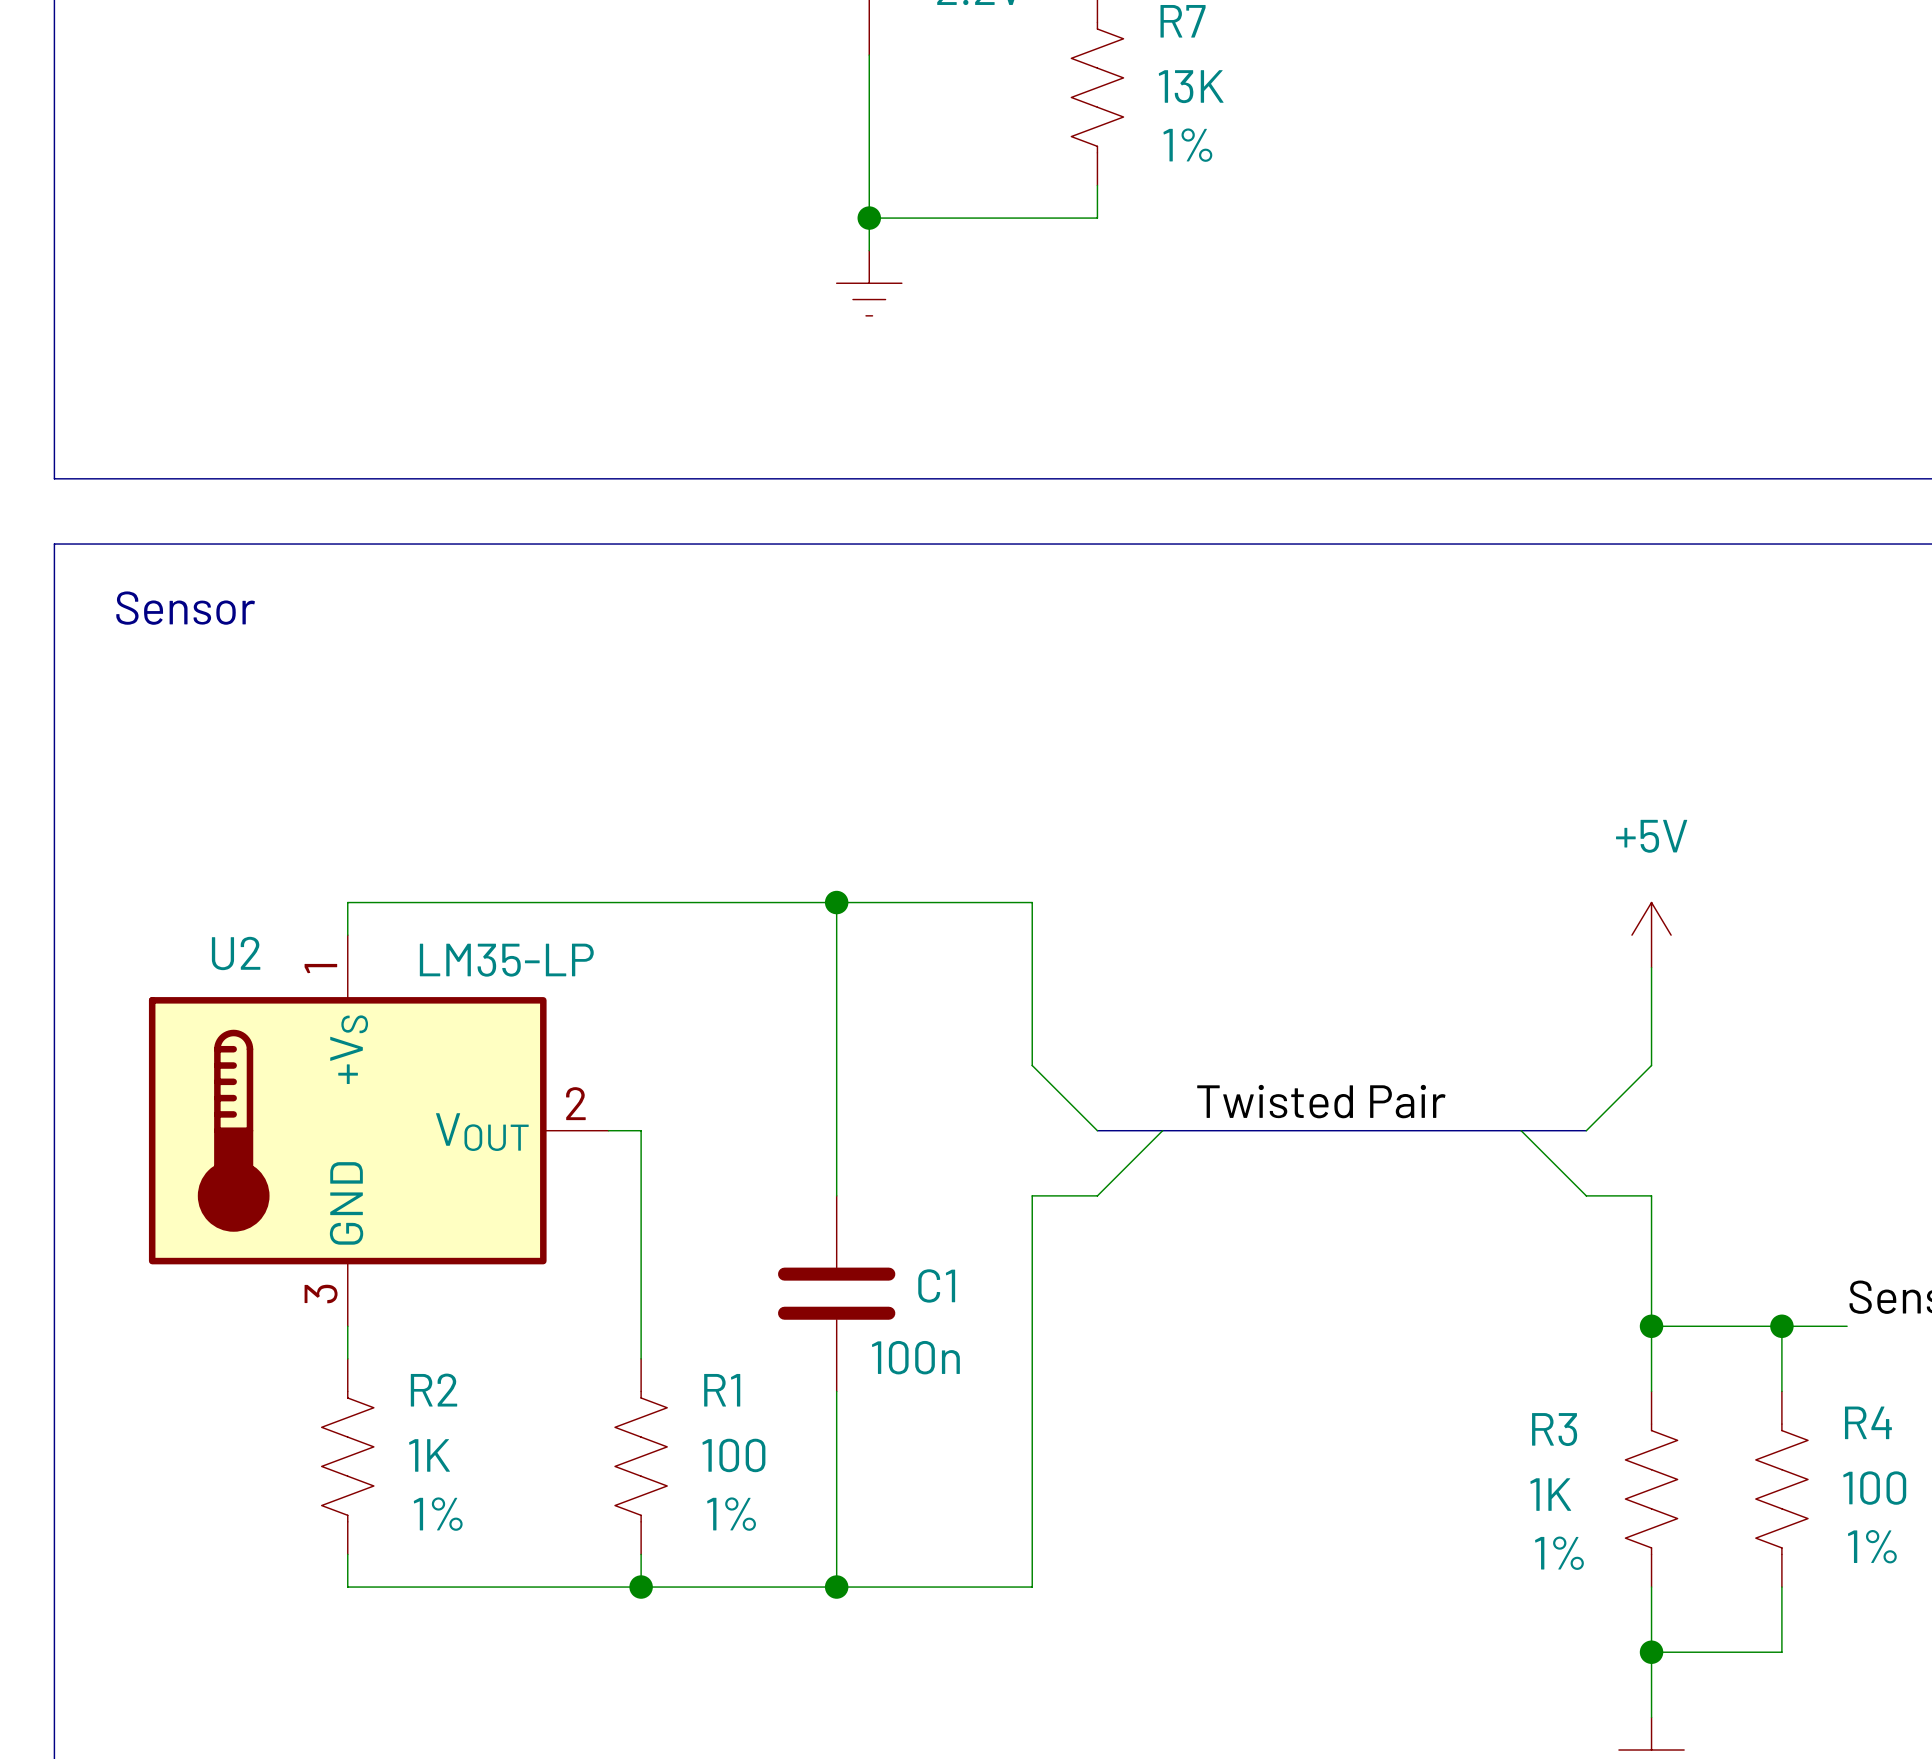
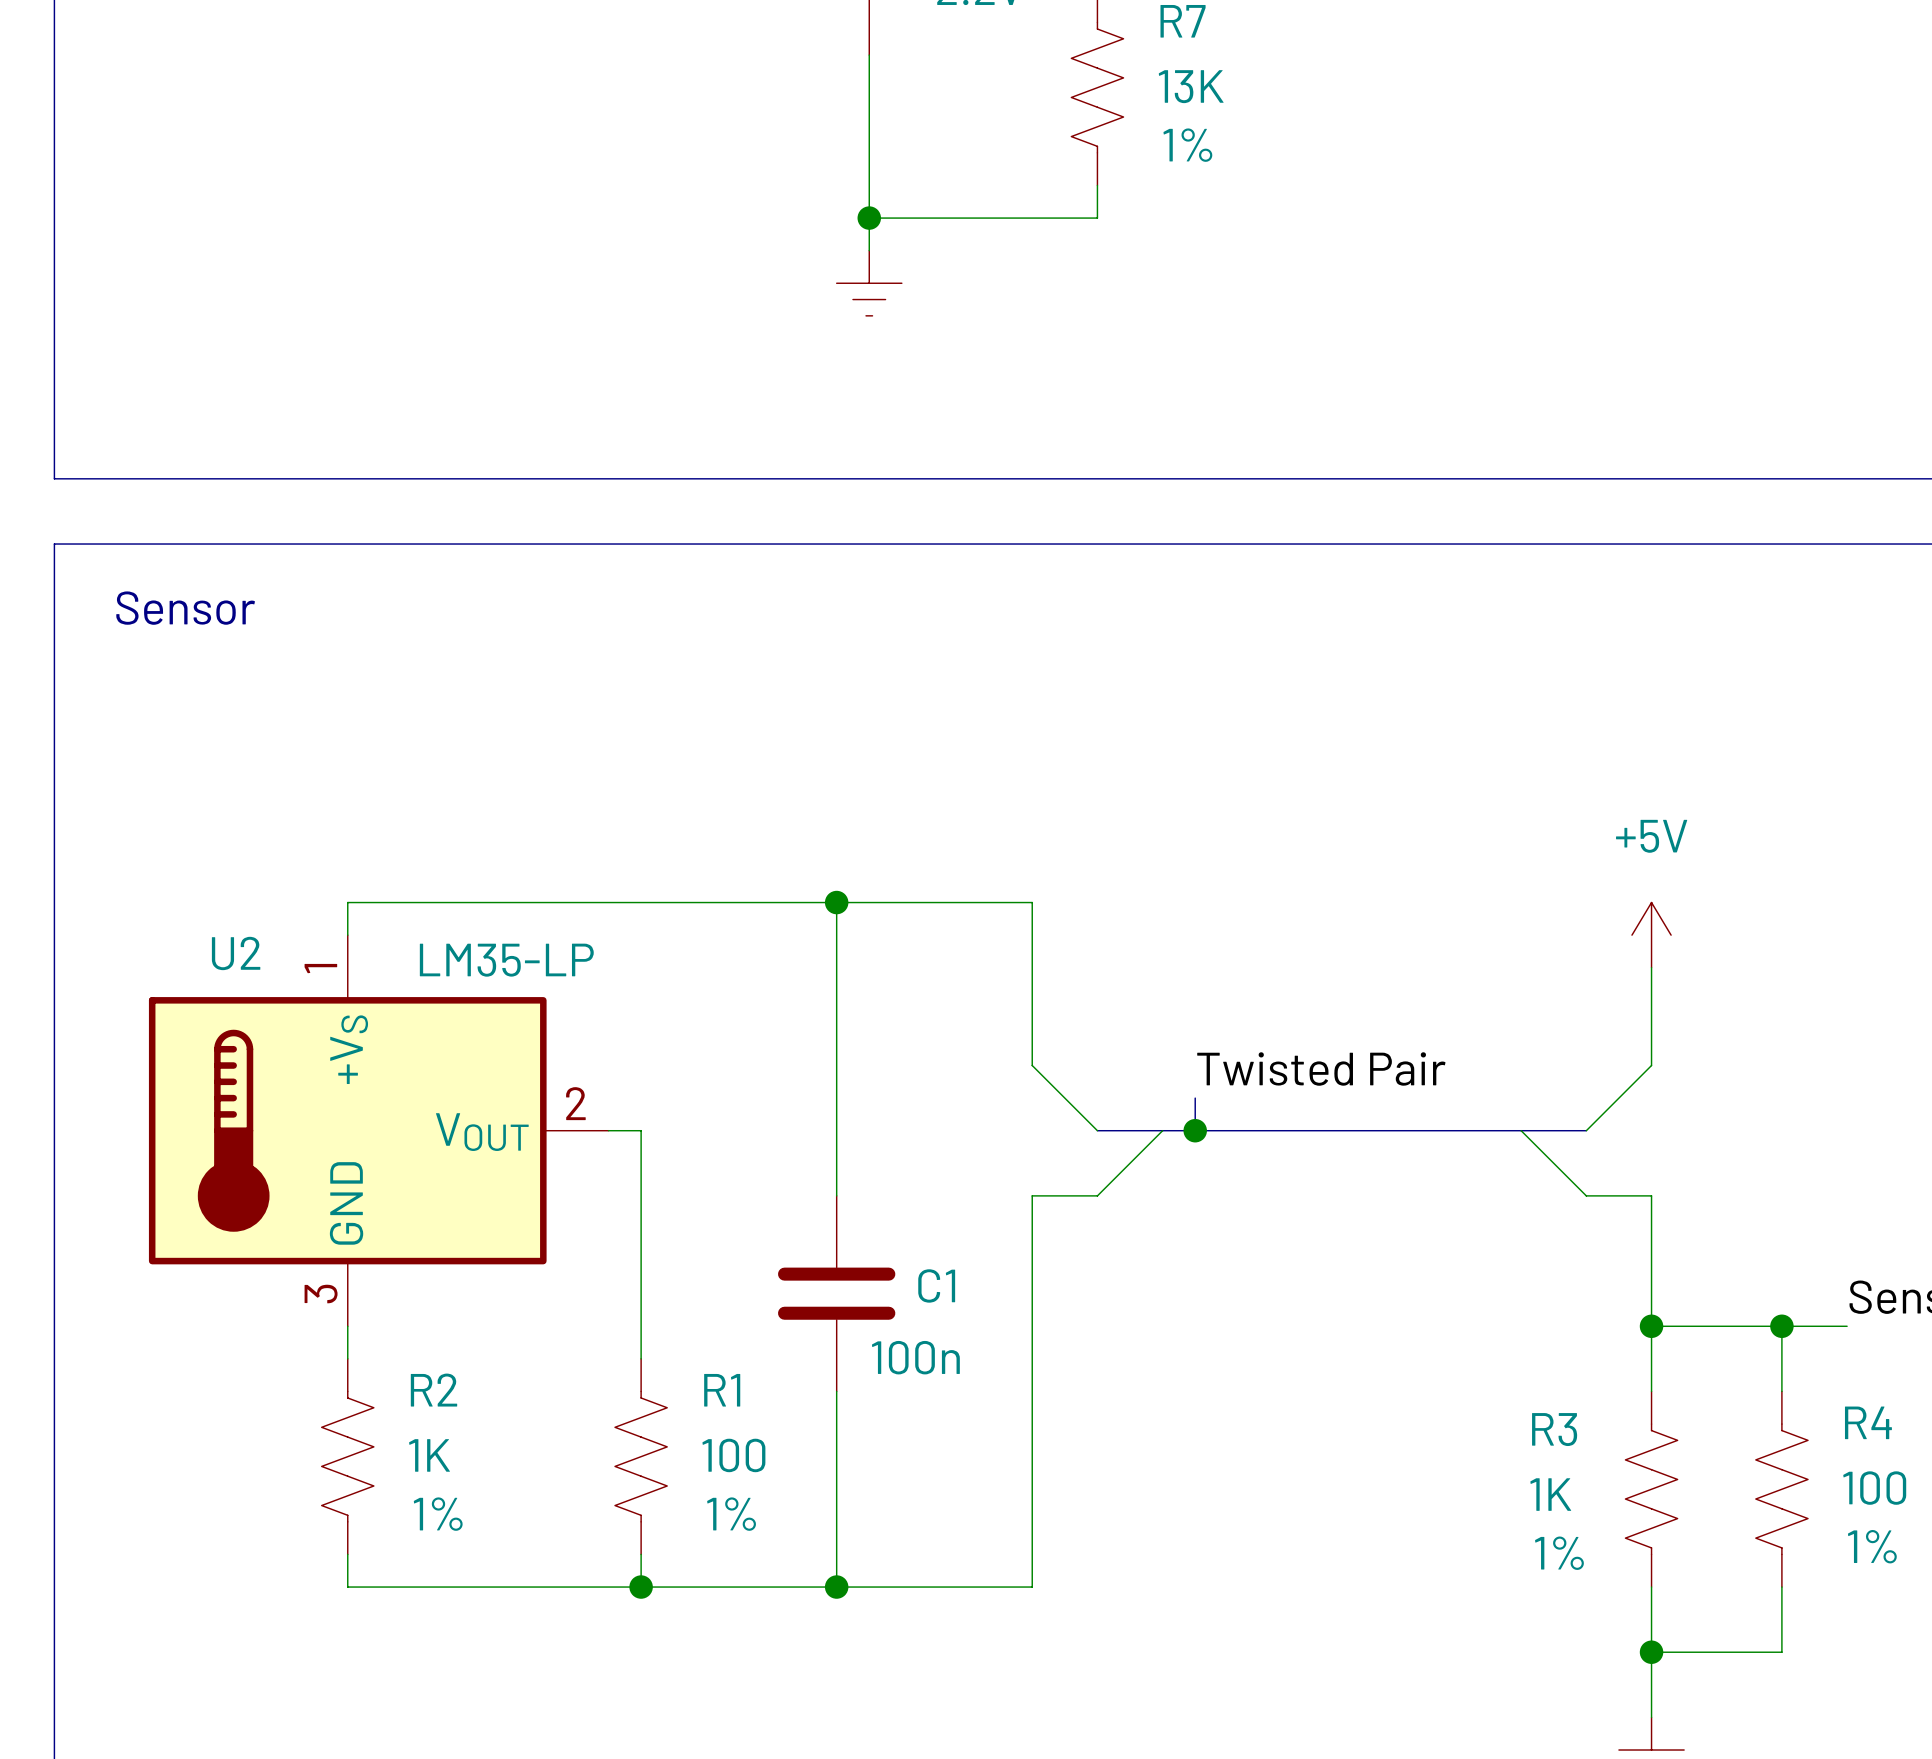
bus: none -> (1195, 1098) (1195, 1130)
label position: Twisted Pair (1321, 1101) -> Twisted Pair (1321, 1069)
junction: none -> (1195, 1130)

